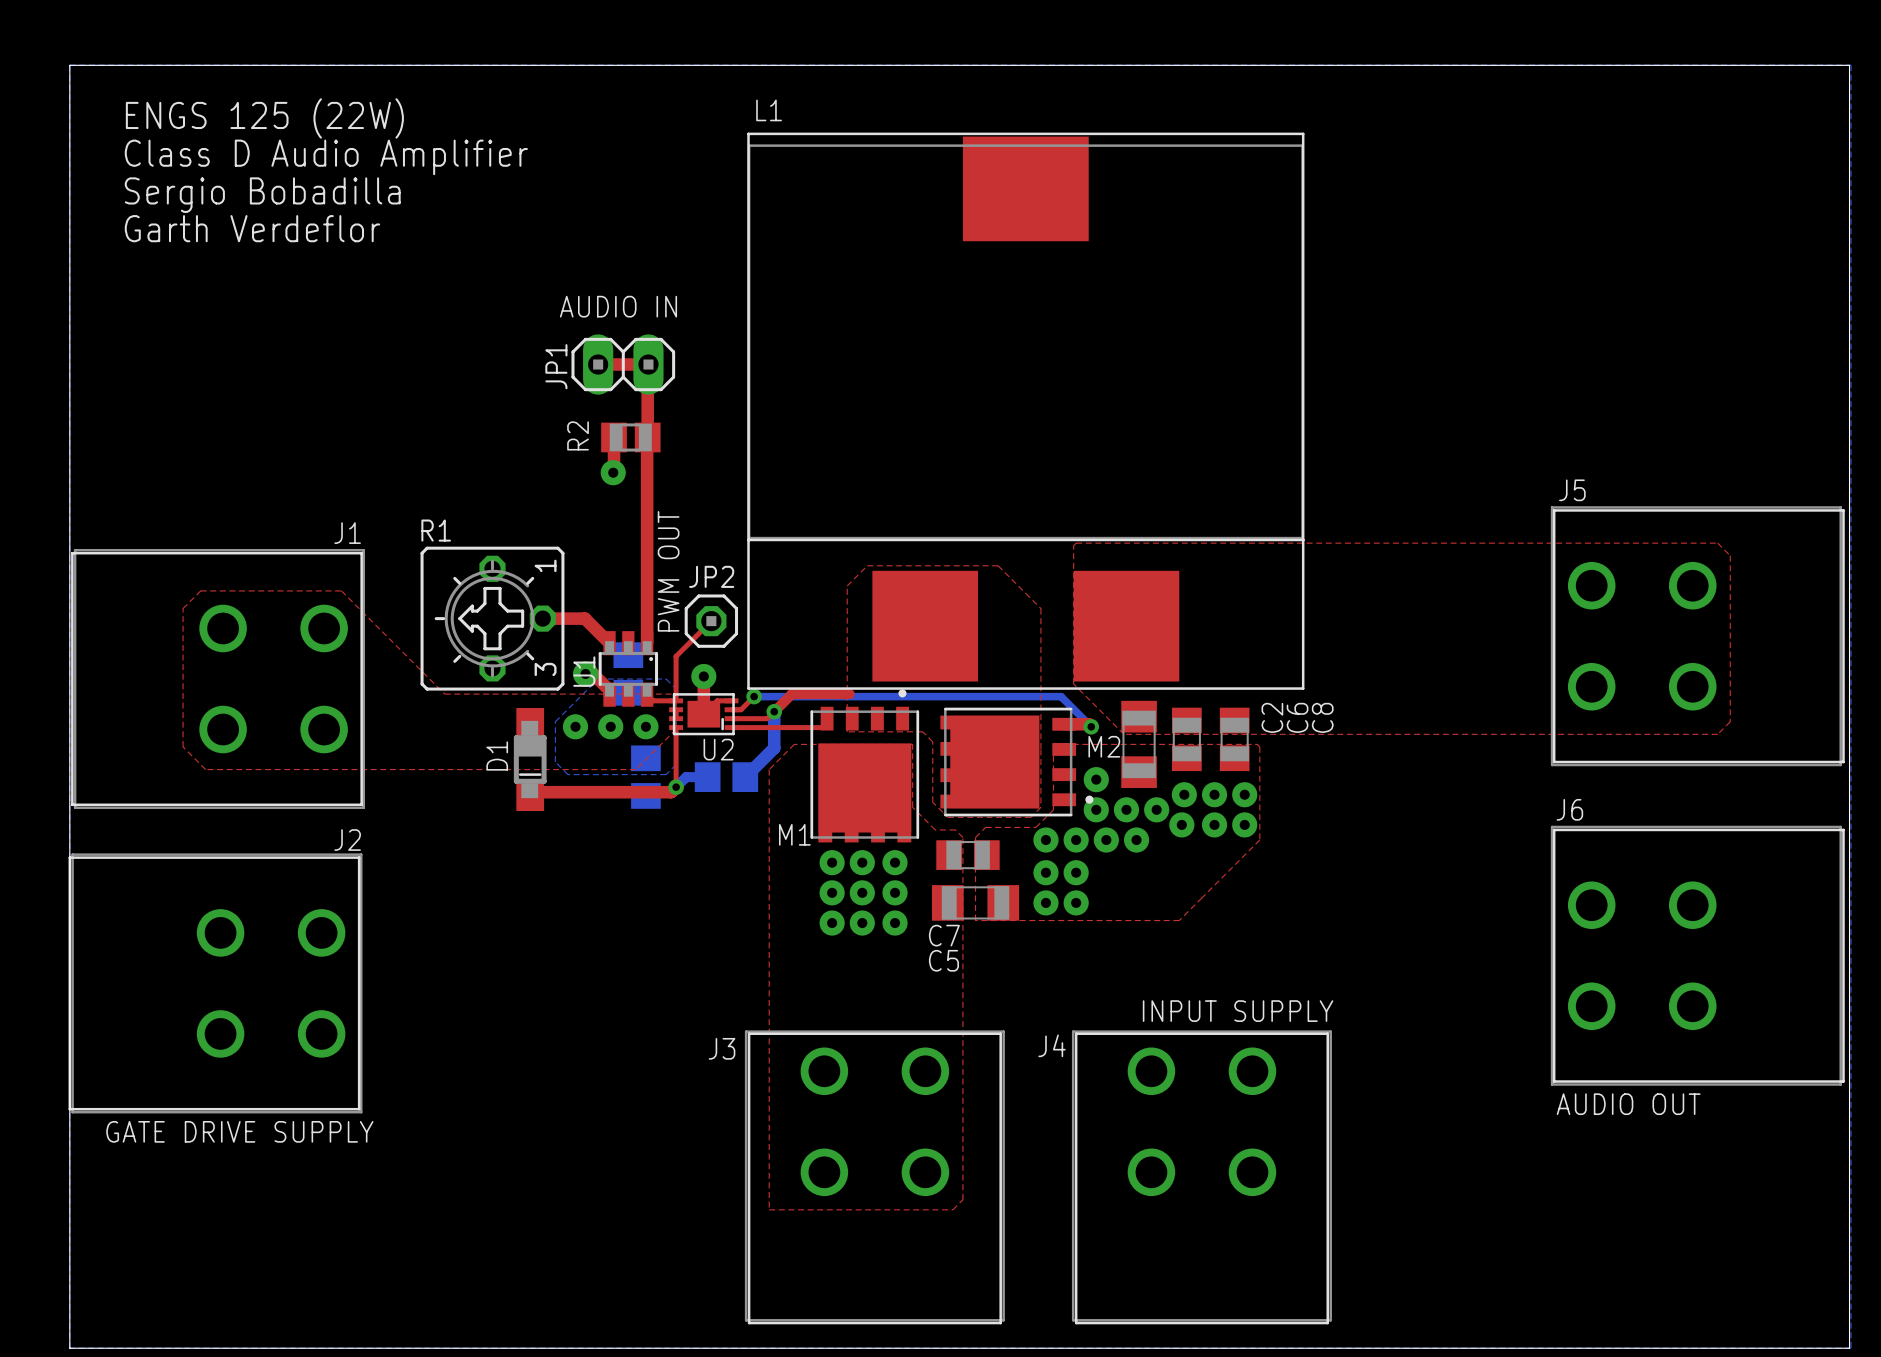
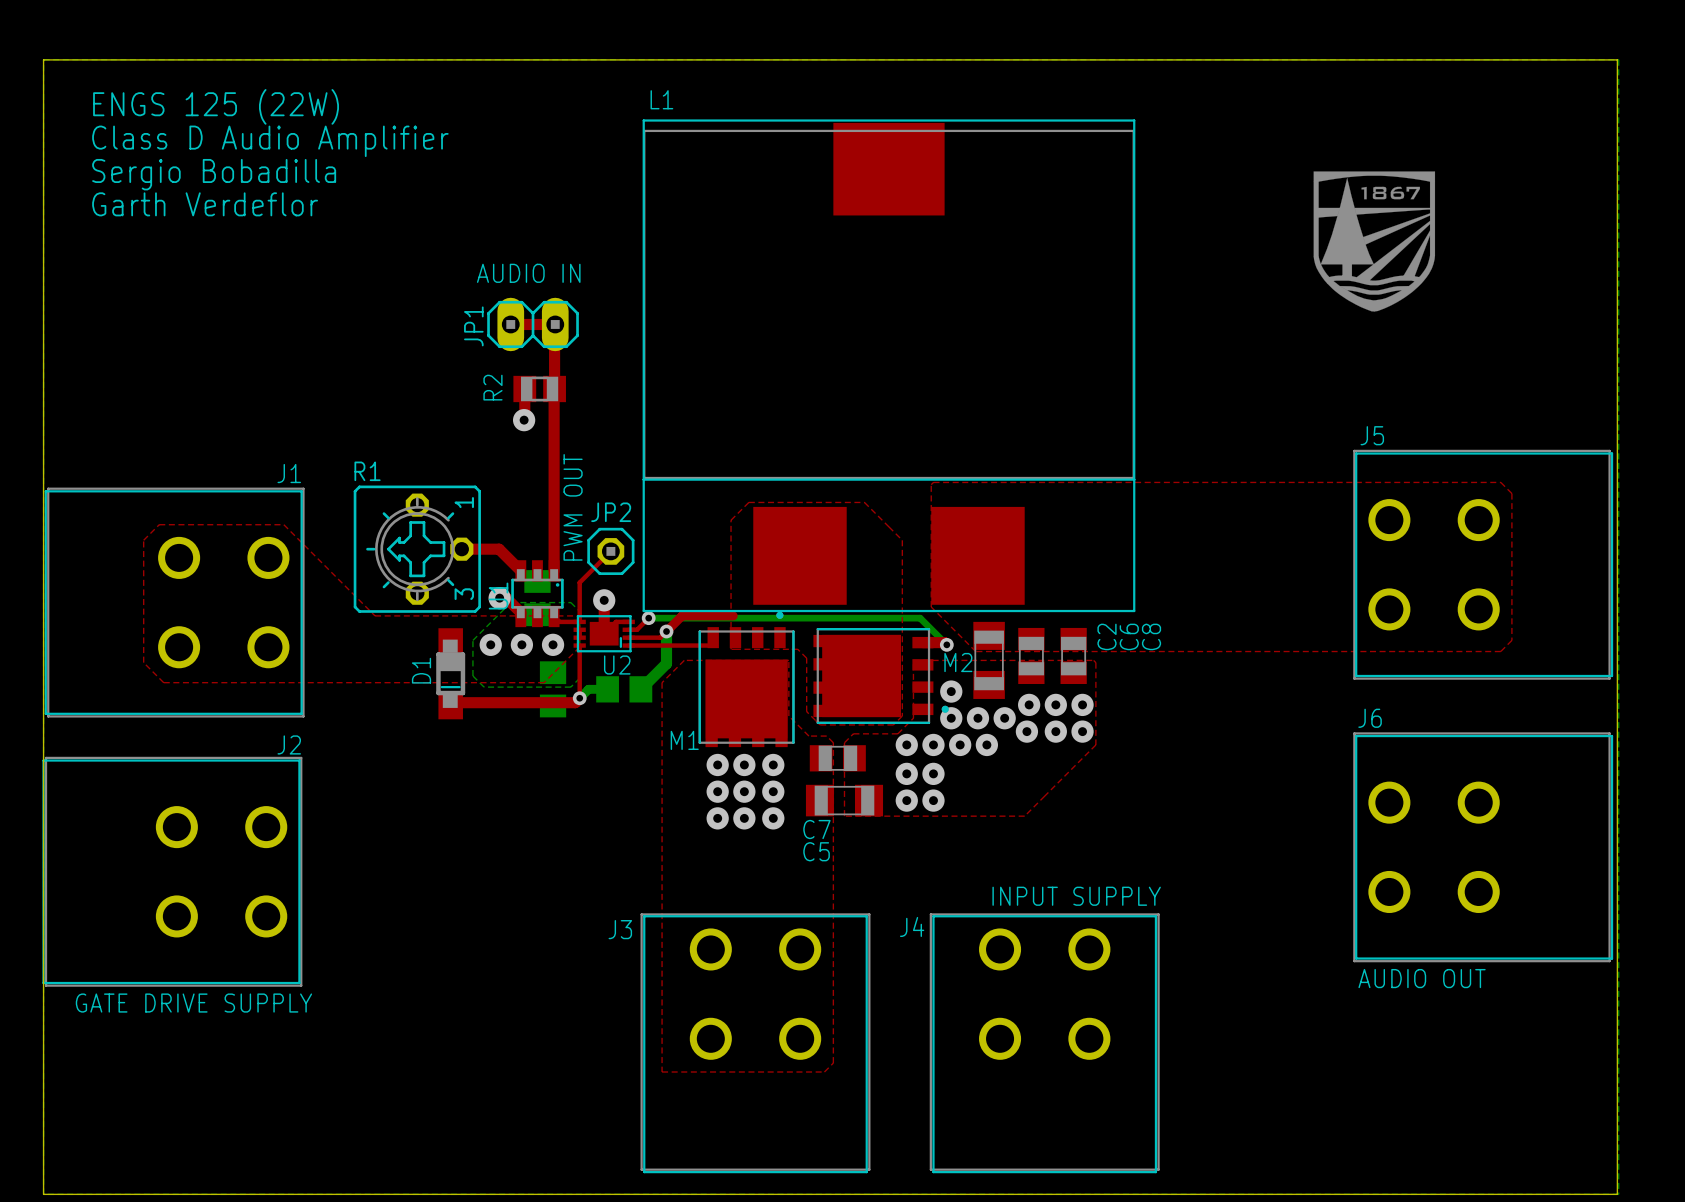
drawing: none -> [1313, 171, 1436, 312]

